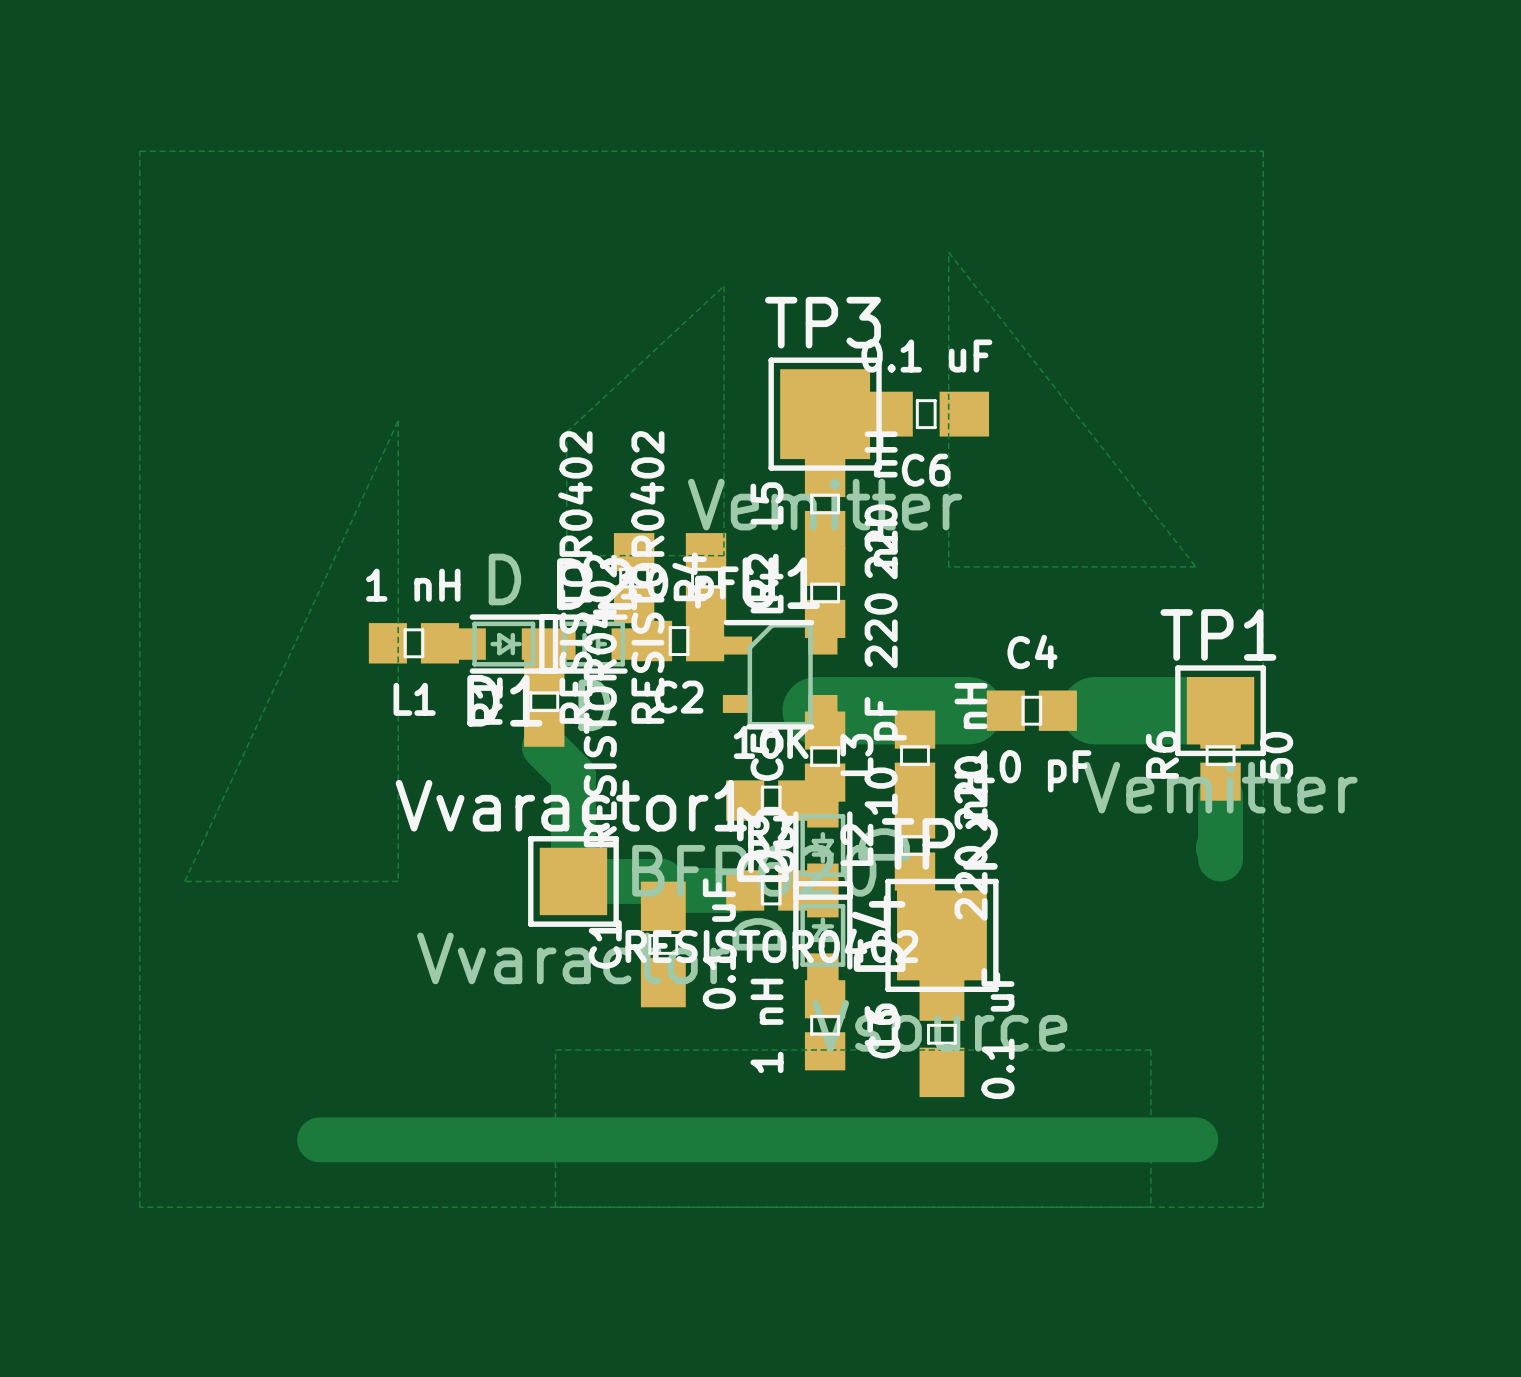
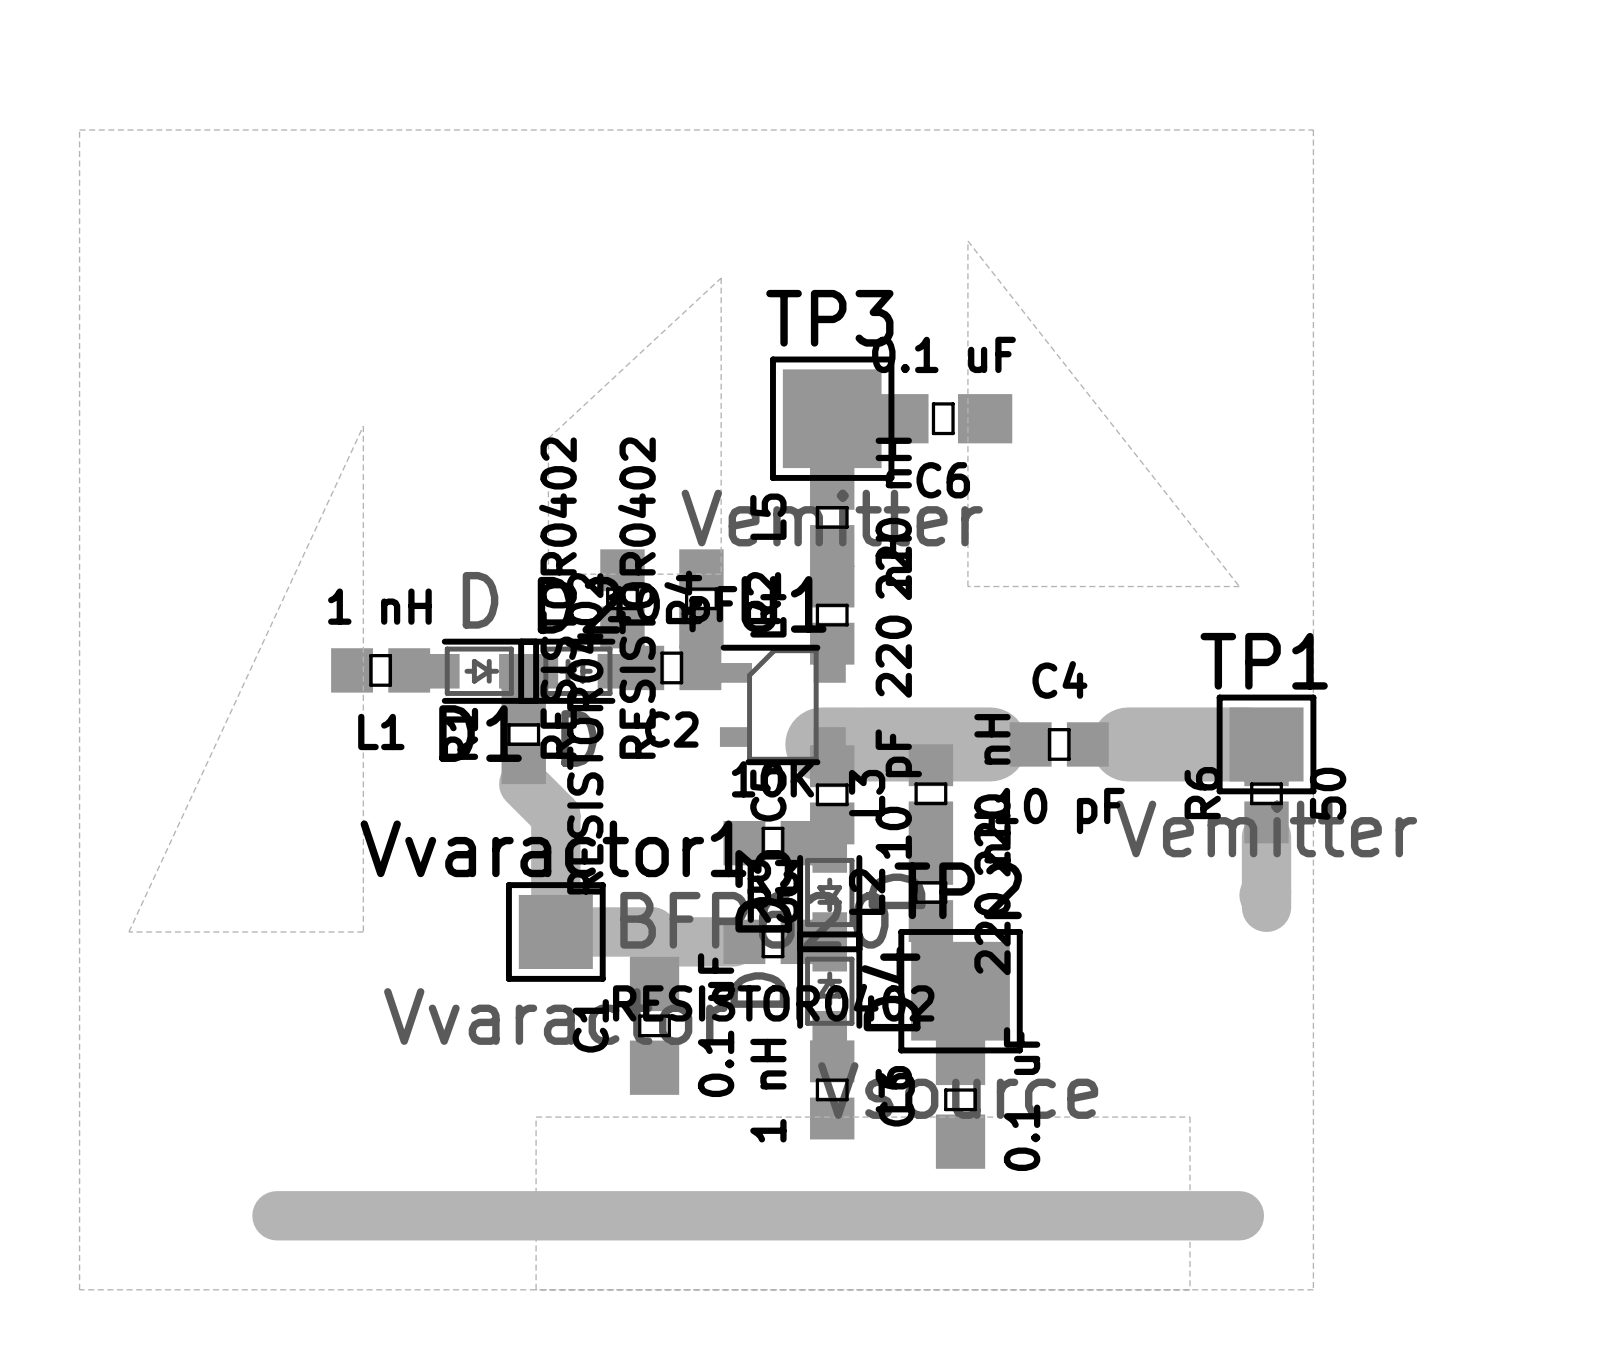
C1 position: (663, 944) -> (654, 1025)

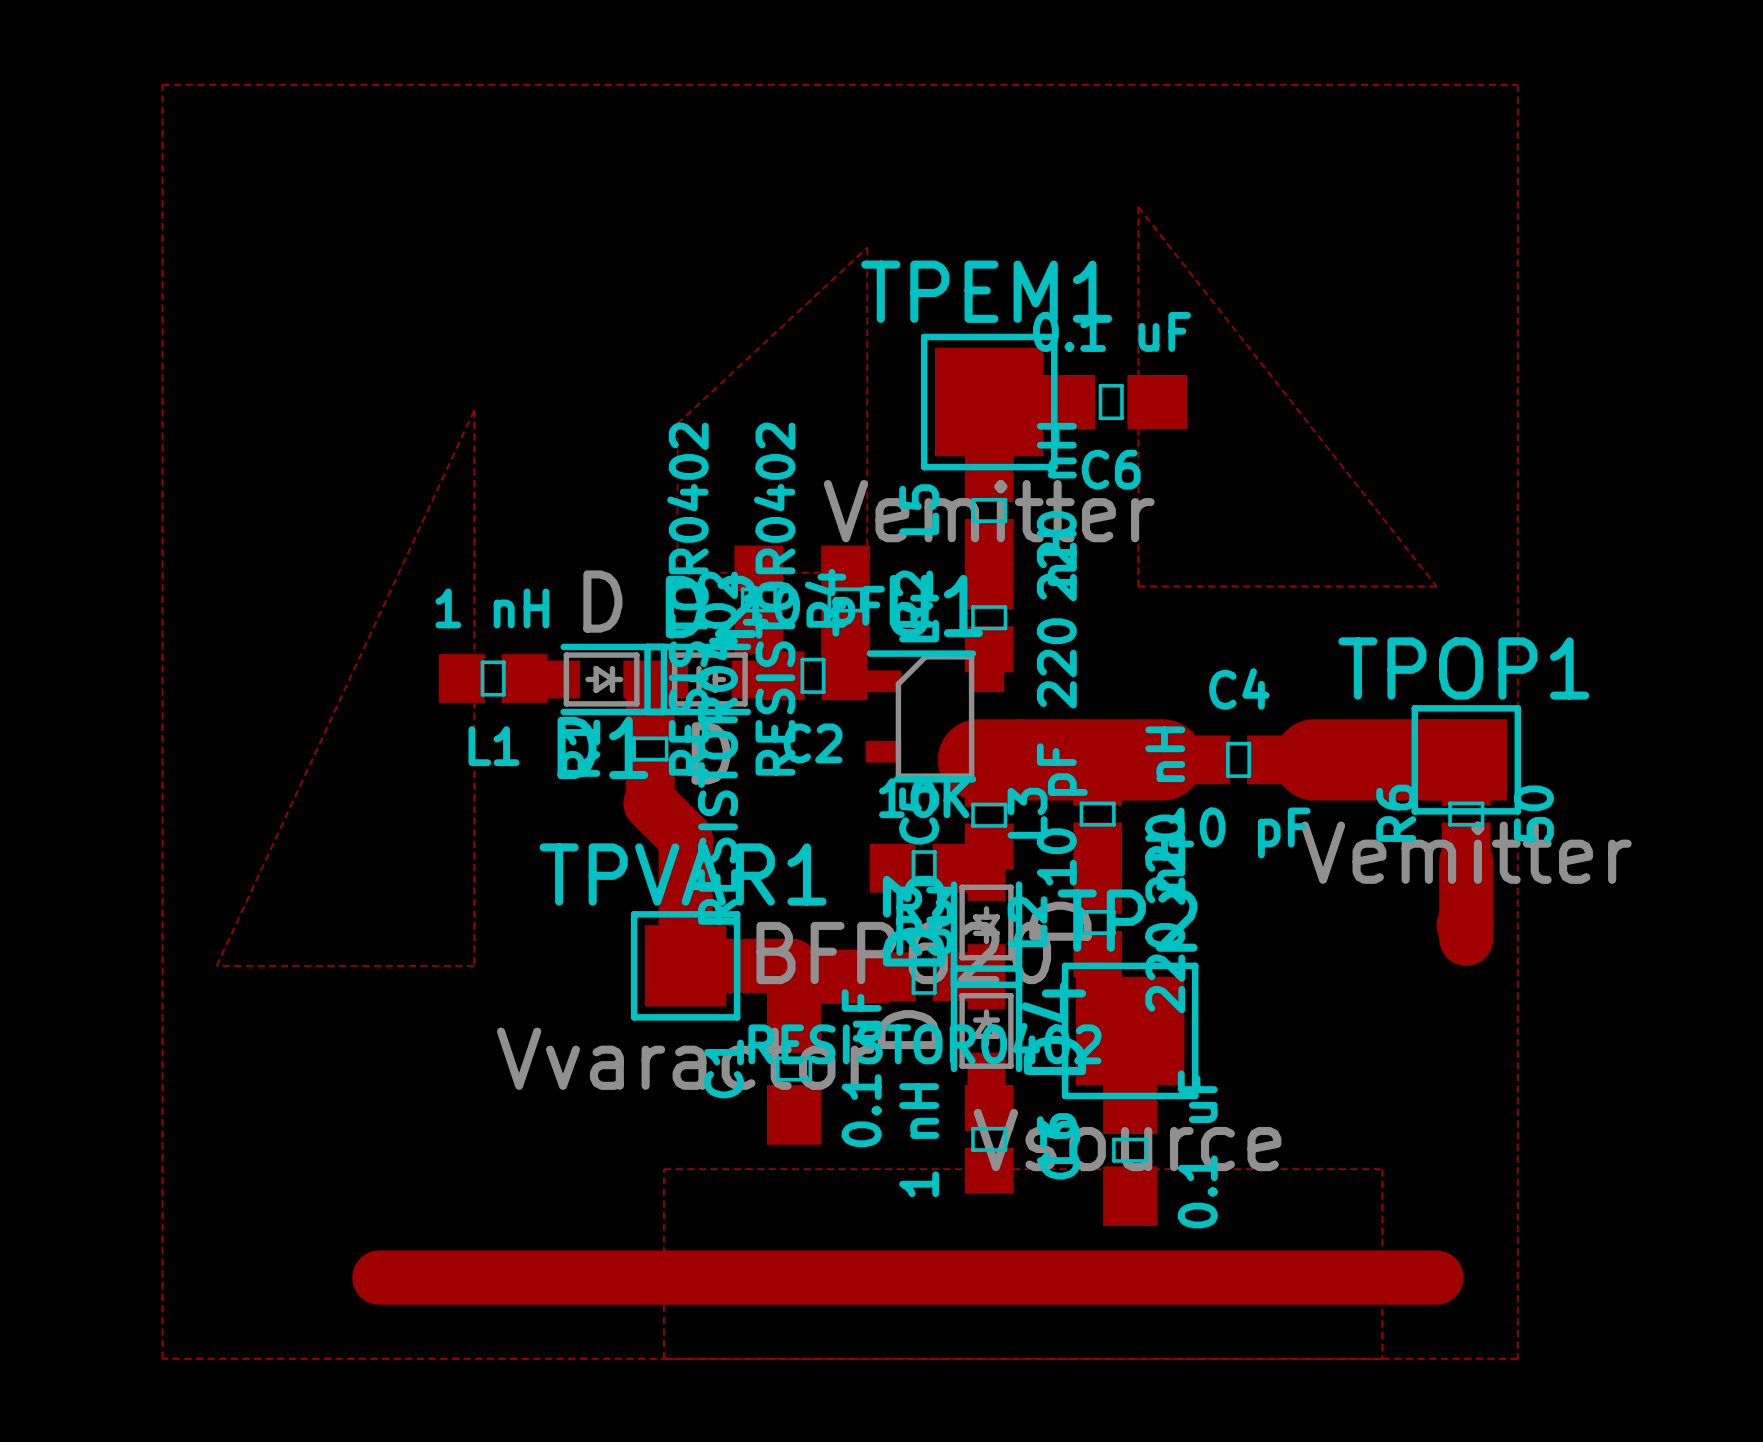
TP3 name: TP3 (829, 318) -> TPEM1 (986, 291)
TP1 name: TP1 (1264, 661) -> TPOP1 (1463, 668)
Vvaractor1 name: Vvaractor1 (553, 848) -> TPVAR1 (683, 874)

